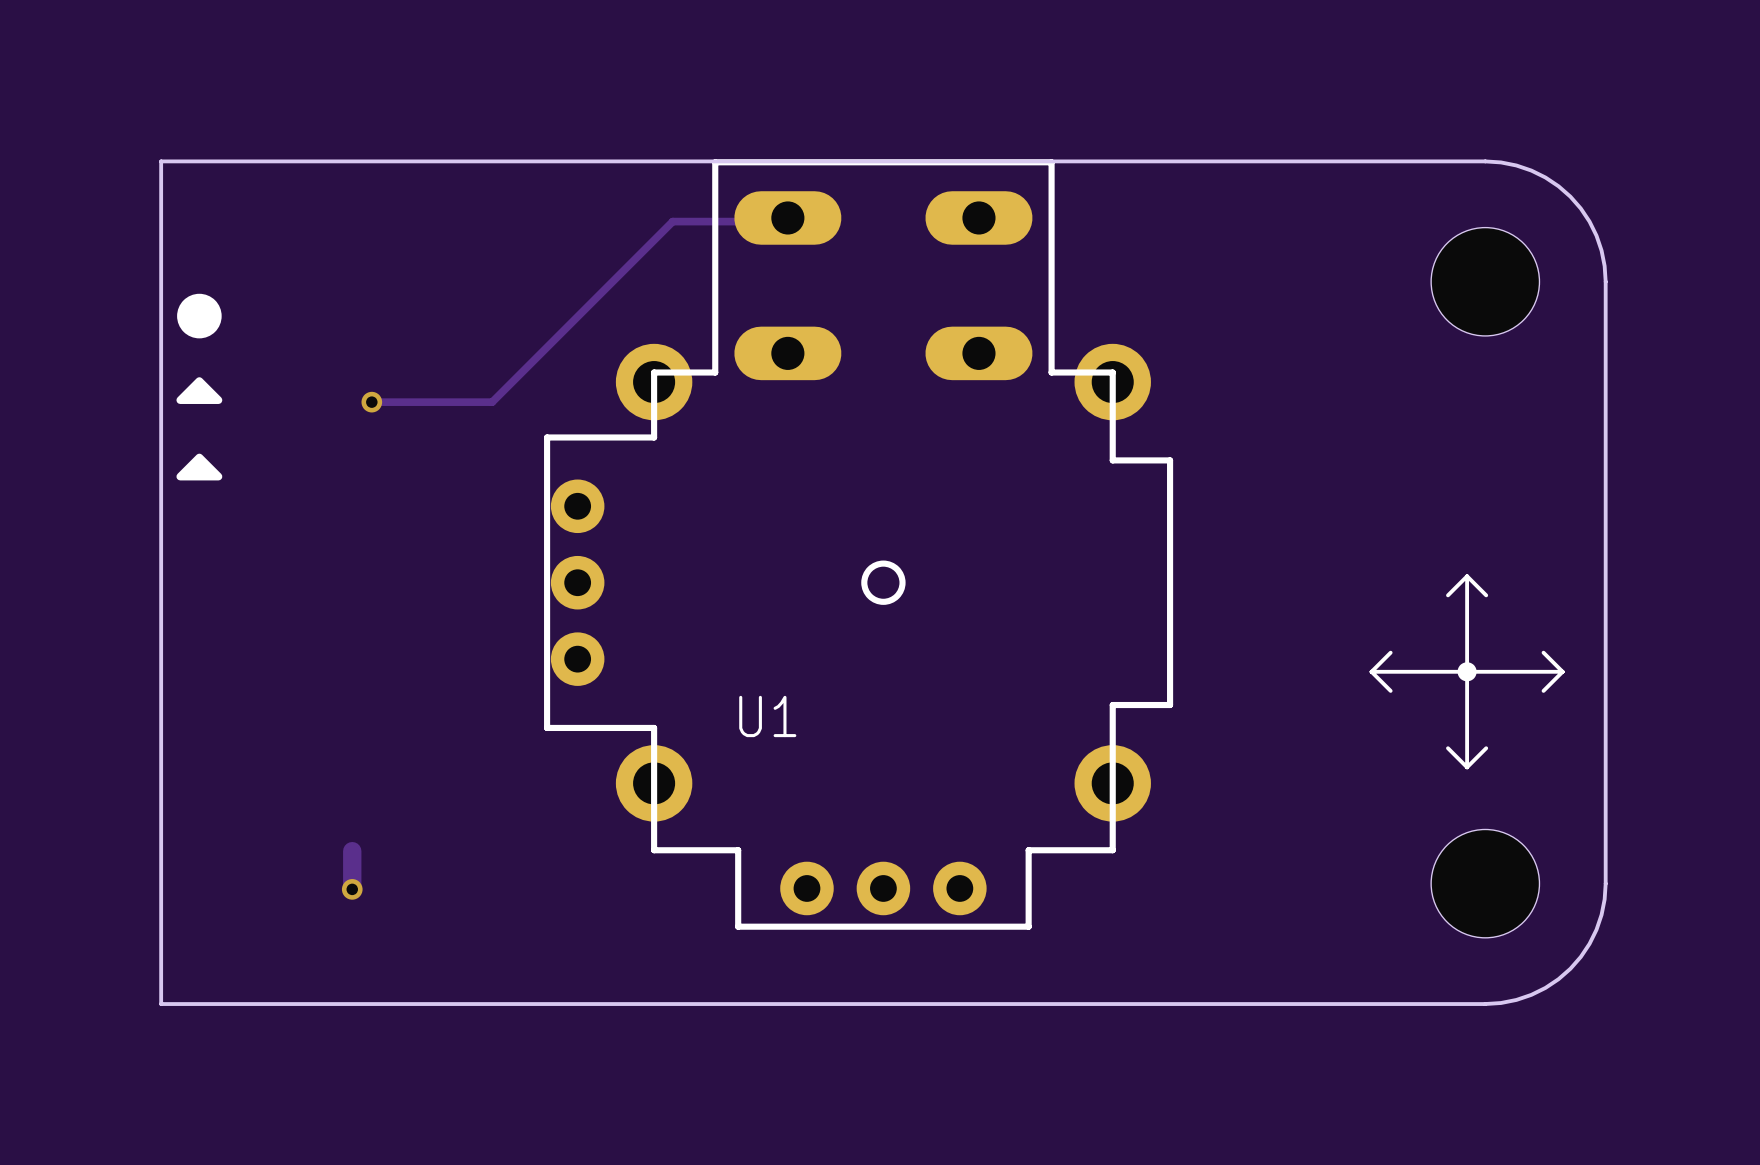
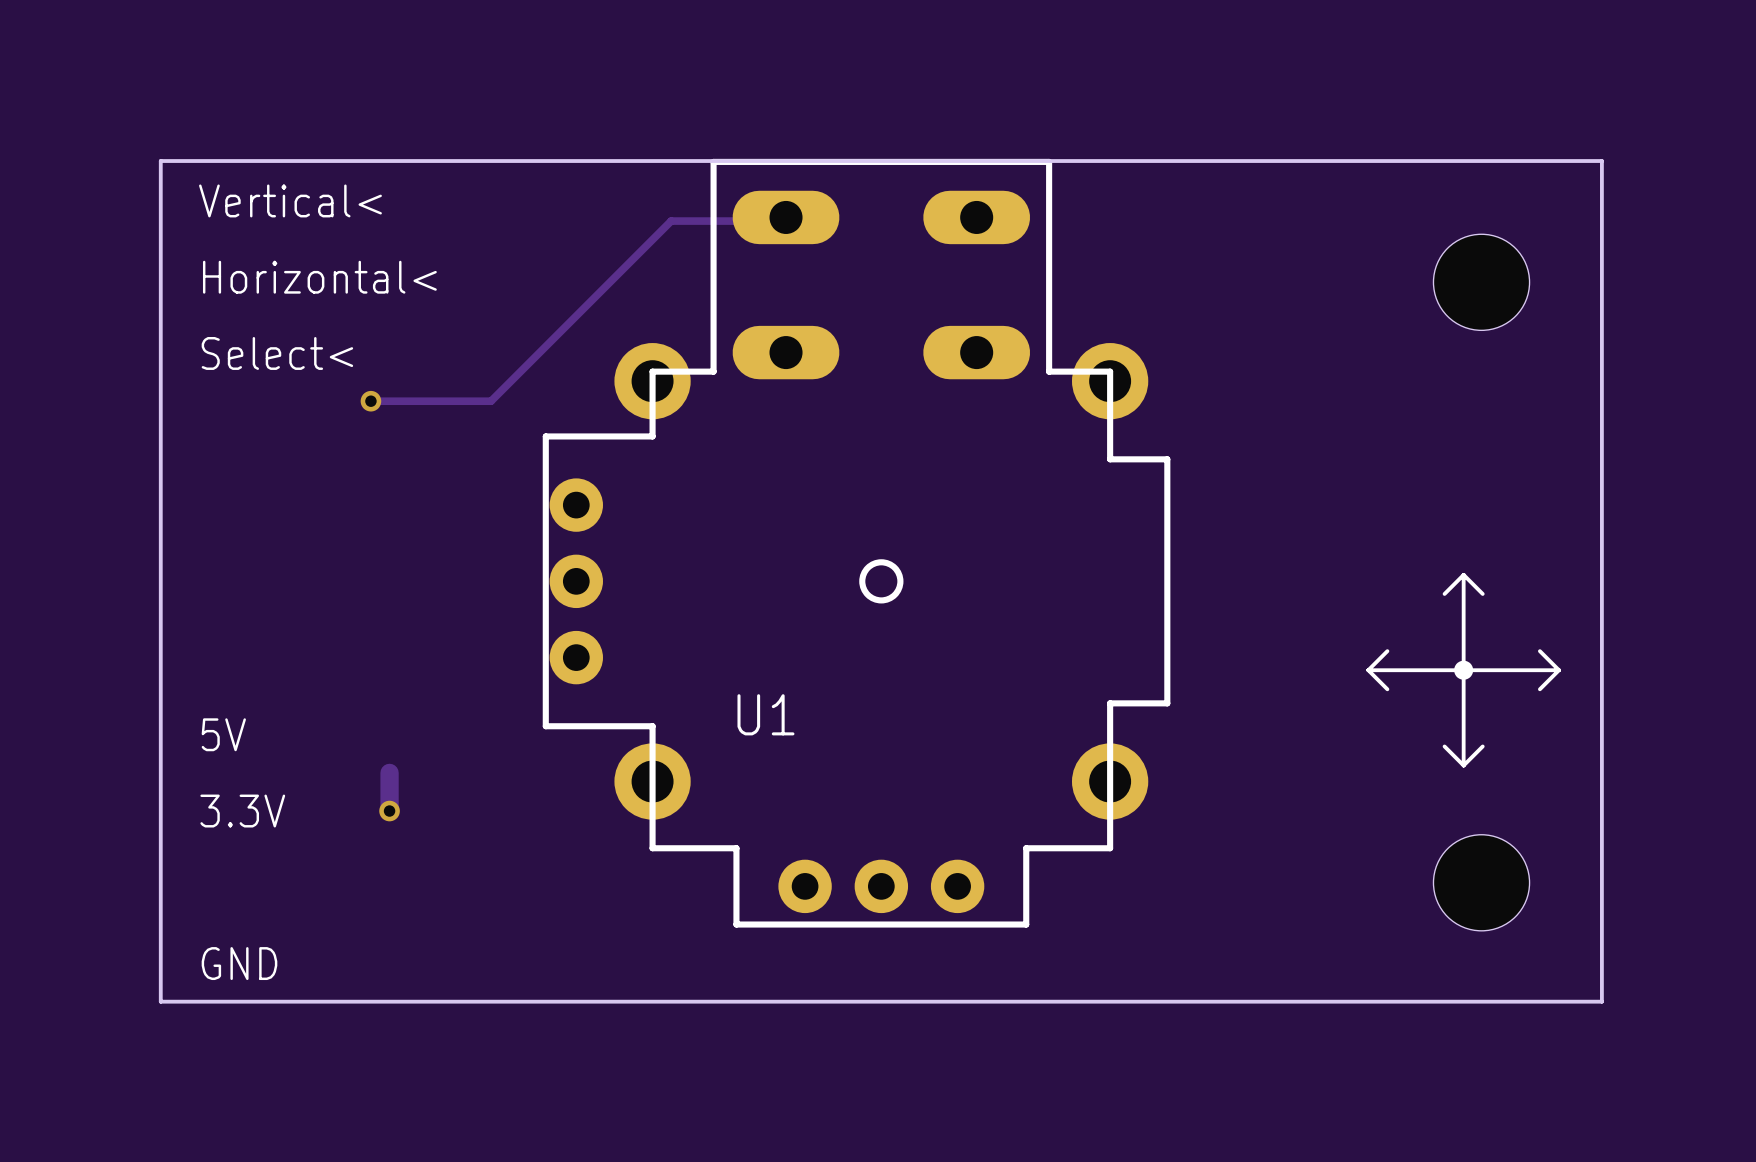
part footprint: [159, 159, 1608, 1006] -> [158, 159, 1604, 1004]
text: none -> Vertical< (290, 200)
text: none -> Horizontal< (319, 277)
drawing: [177, 293, 222, 339] -> none
text: none -> Select< (277, 353)
drawing: [176, 377, 223, 404] -> none
drawing: [176, 453, 223, 481] -> none
text: none -> 5V (223, 734)
text: none -> 3.3V (242, 811)
track: (352, 851) (352, 889) -> (389, 772) (389, 811)
via position: (352, 889) -> (389, 811)
text: none -> GND (239, 963)

